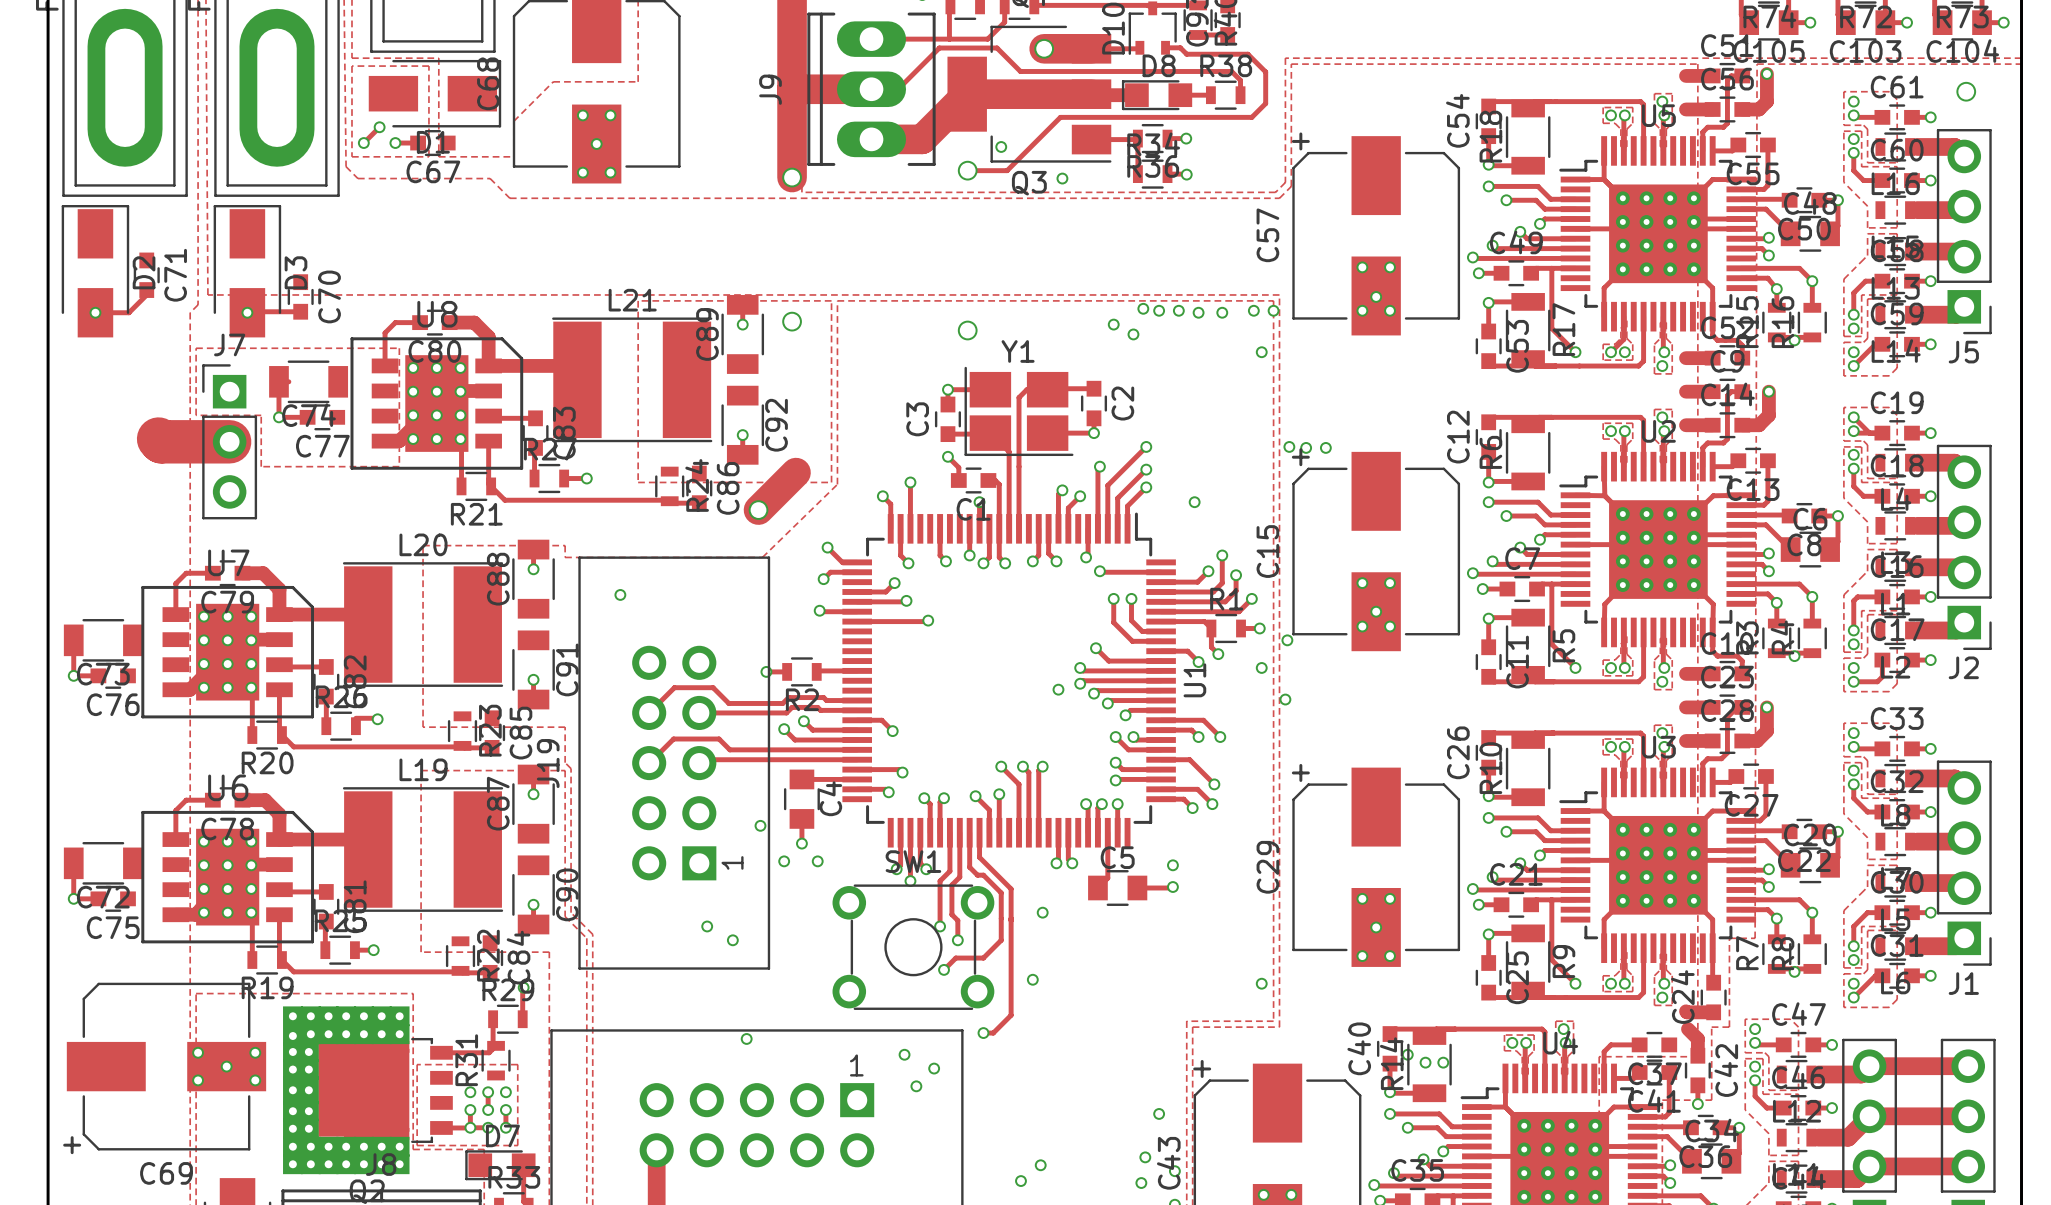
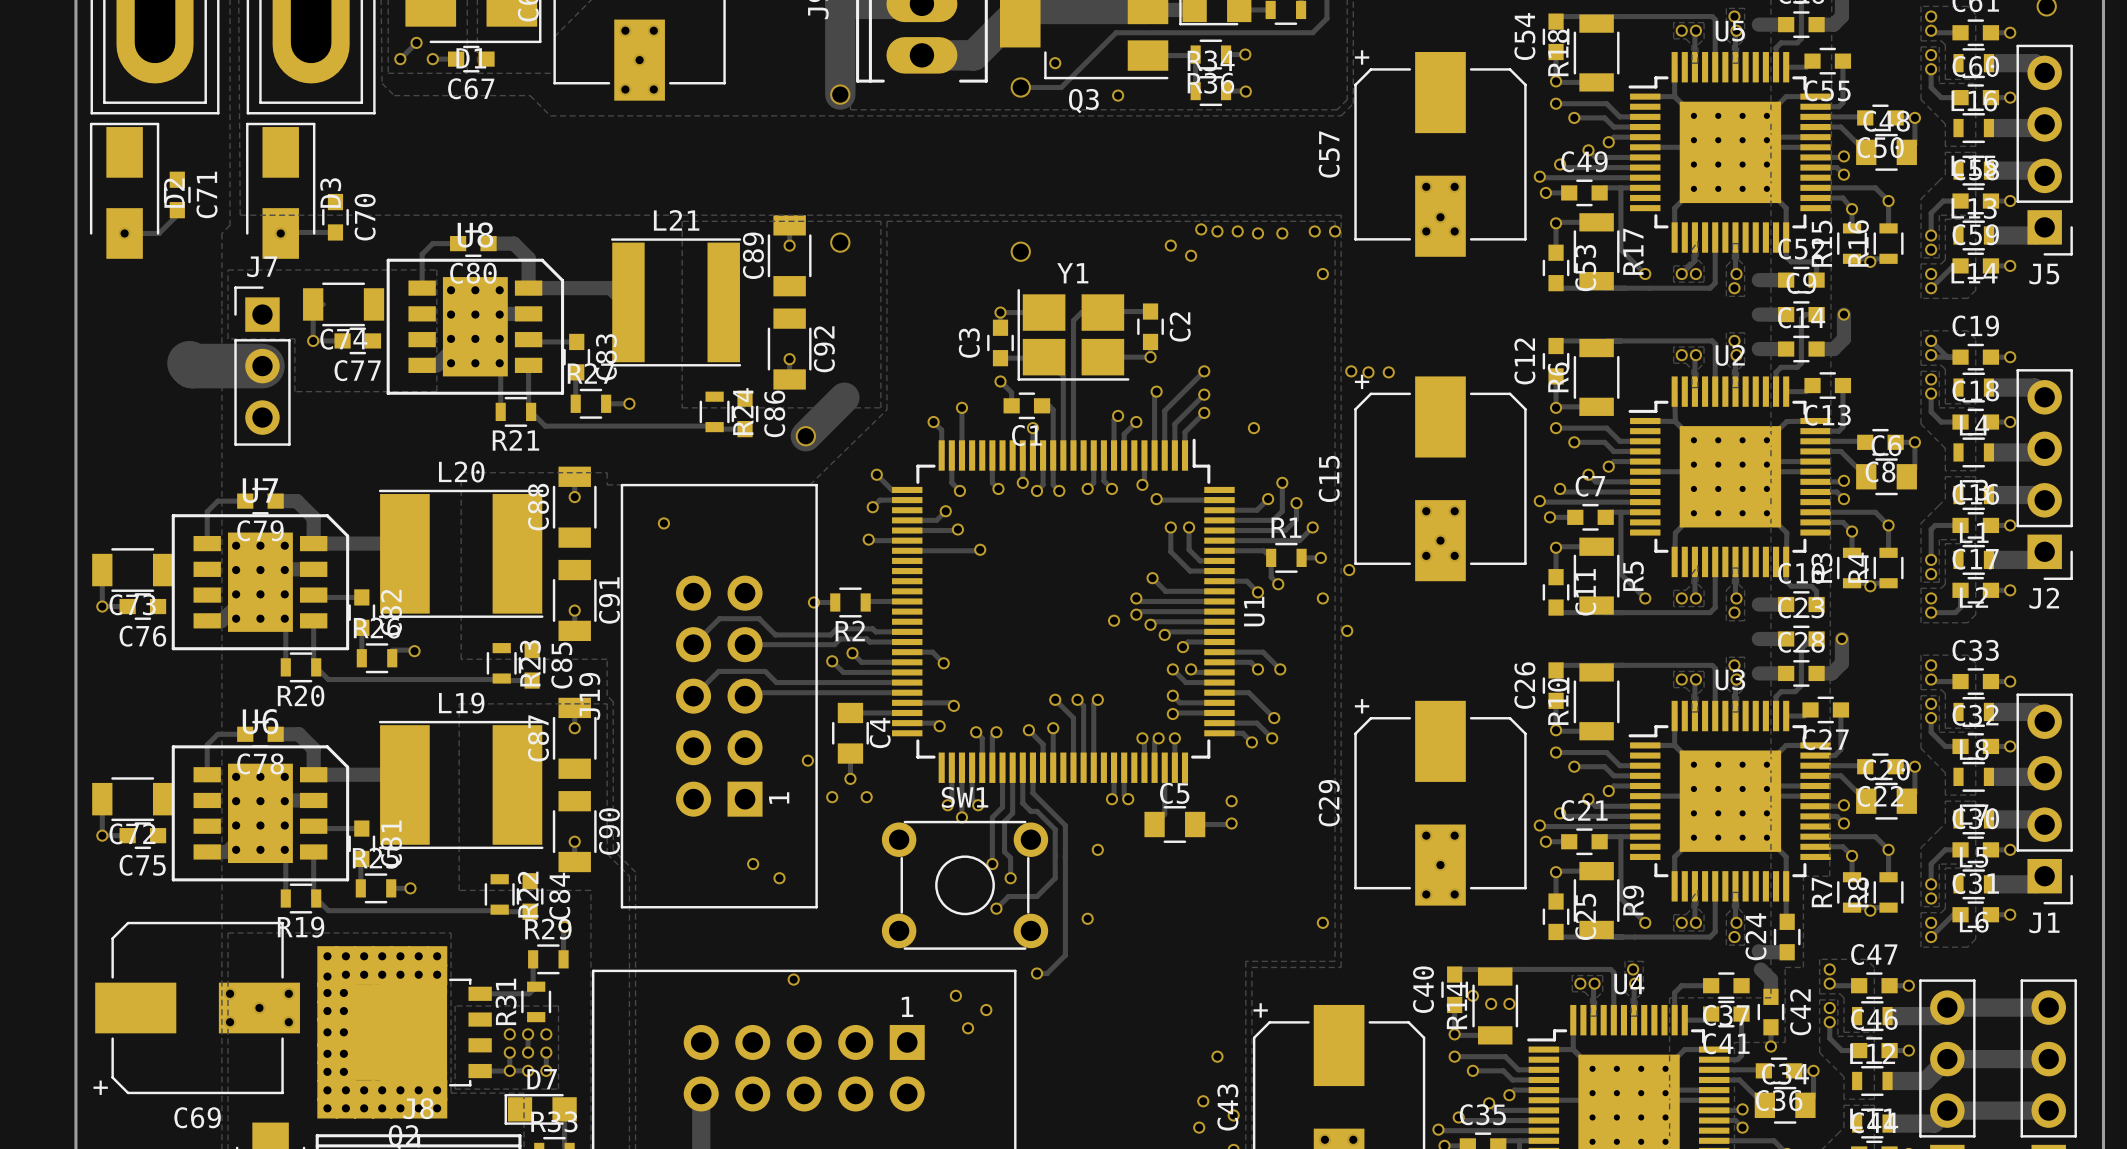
L21 footprint: [552, 317, 713, 443] -> [611, 238, 742, 367]
via: (1040, 1165) -> none
via: (1020, 1181) -> none

